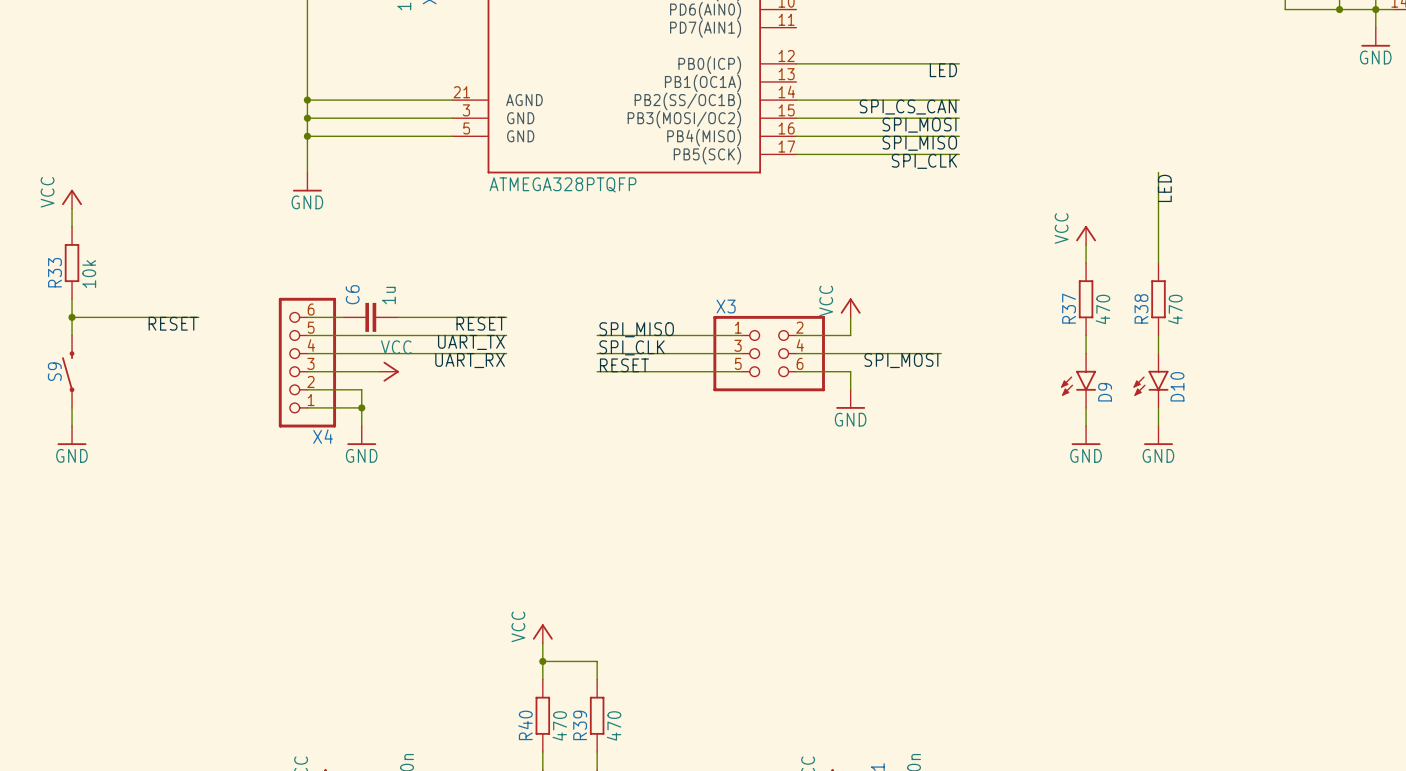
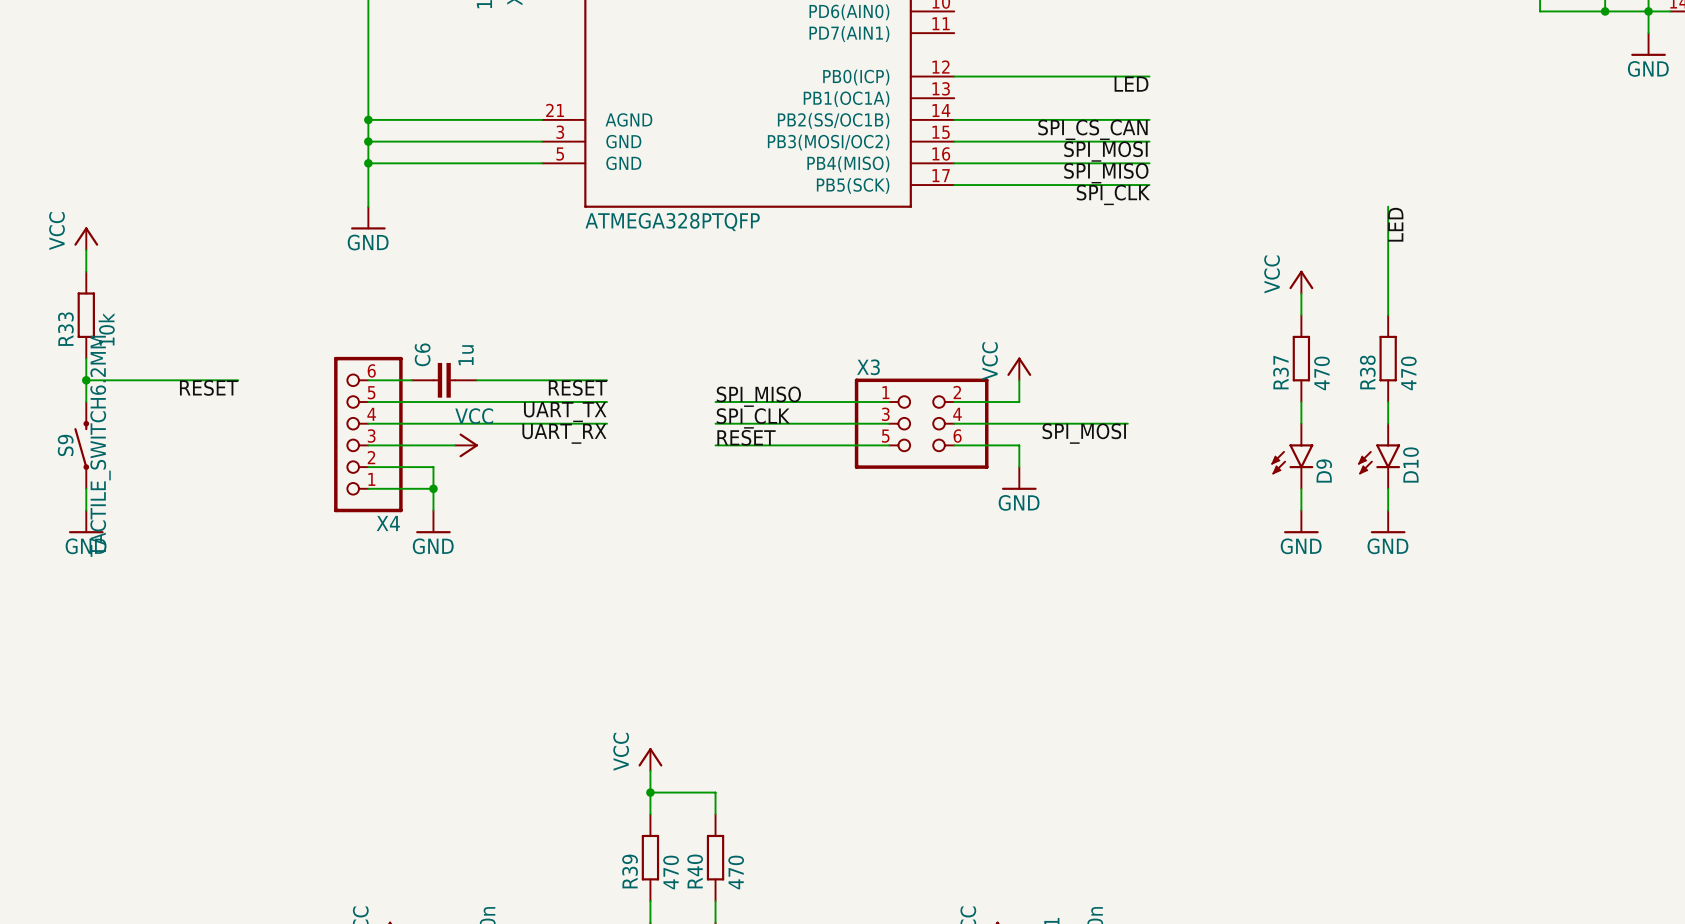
S9 value: none -> TACTILE_SWITCH6.2MM (100, 446)
R40 name: R40 (525, 725) -> R39 (630, 871)
R39 name: R39 (580, 725) -> R40 (695, 871)

